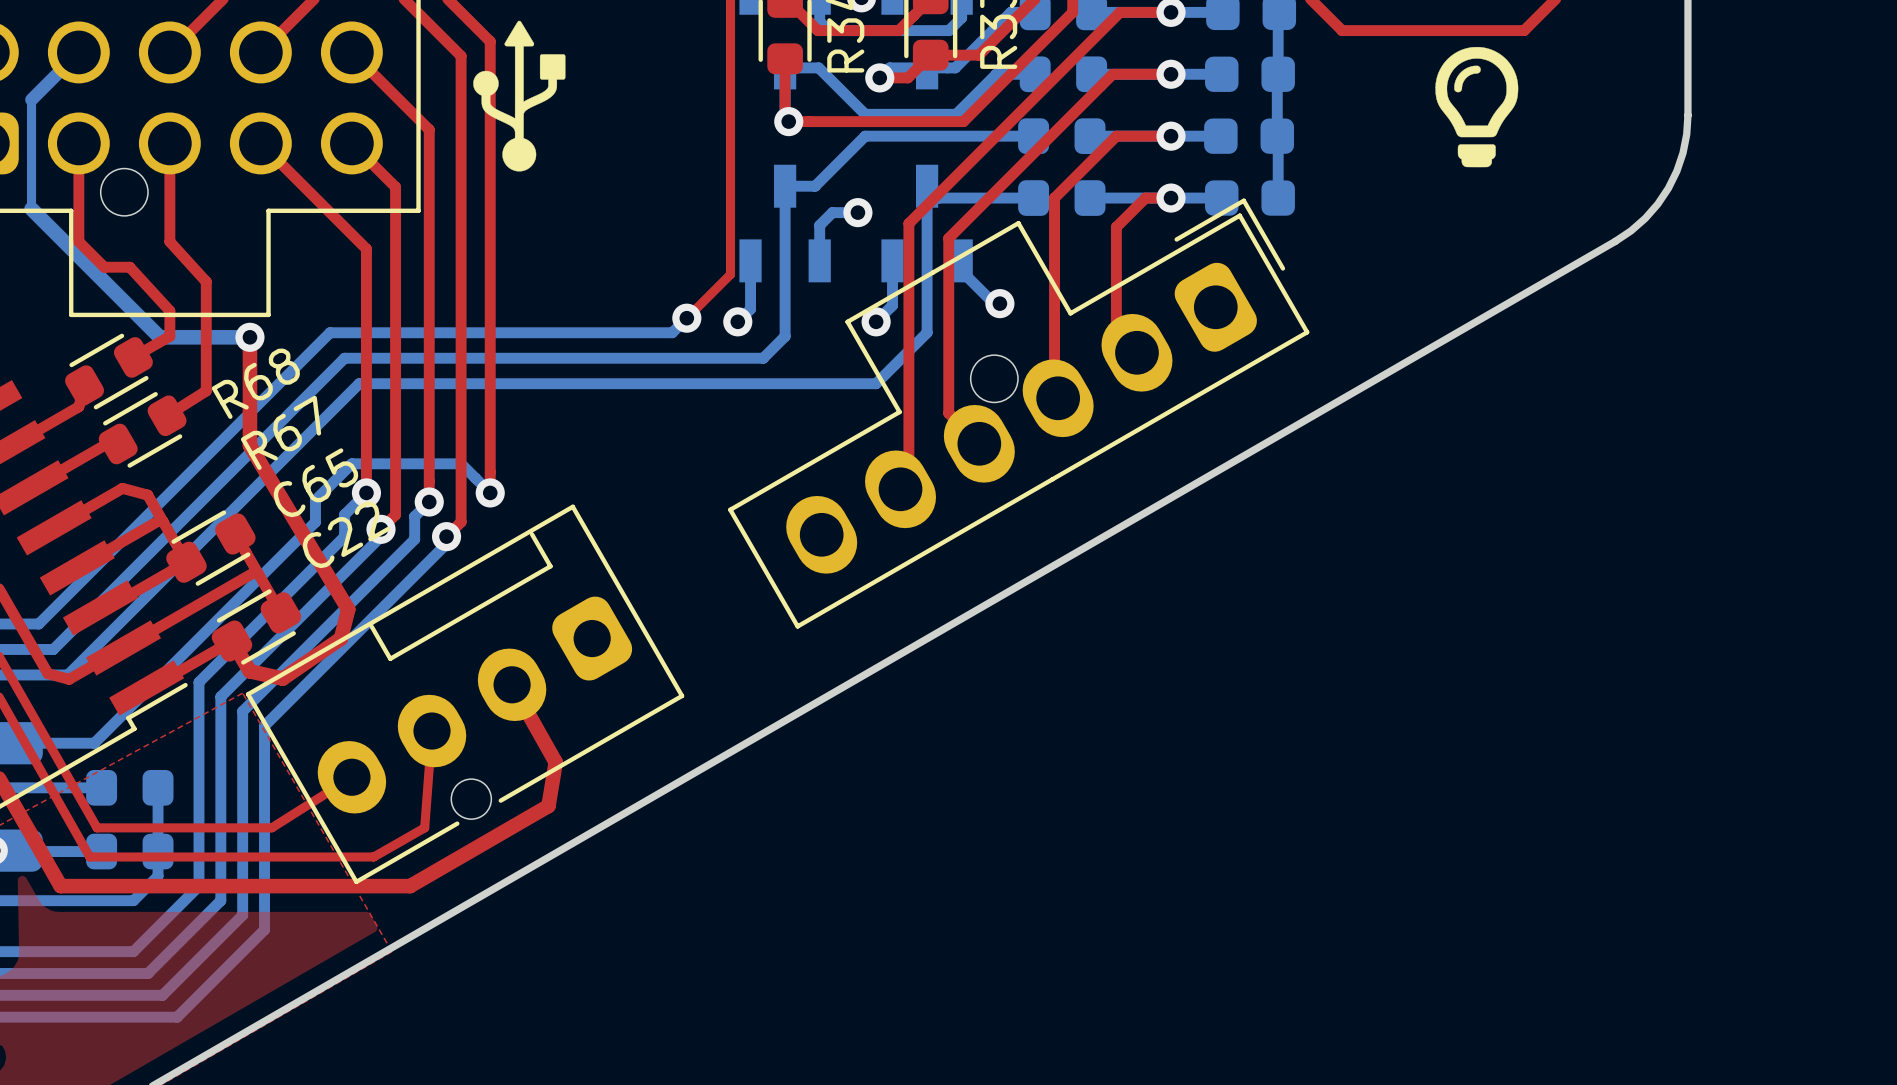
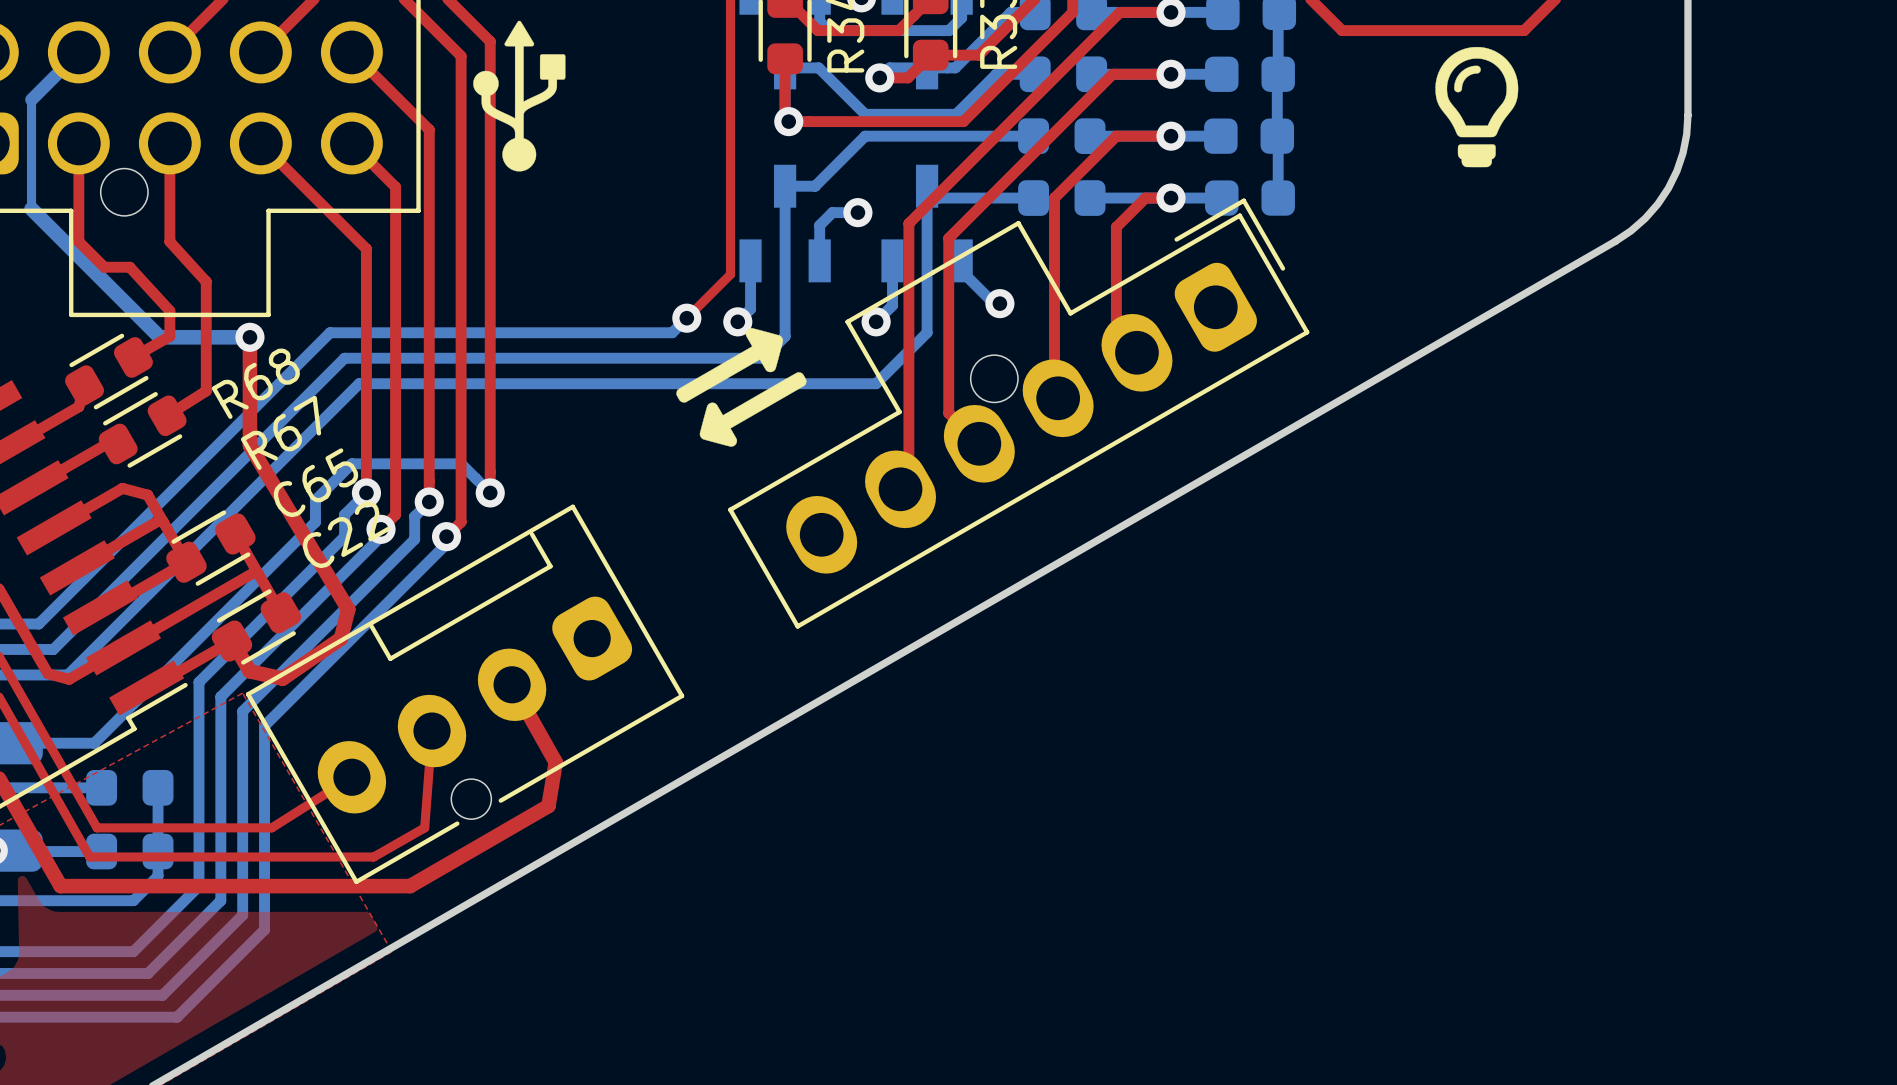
drawing: none -> [676, 328, 807, 447]

